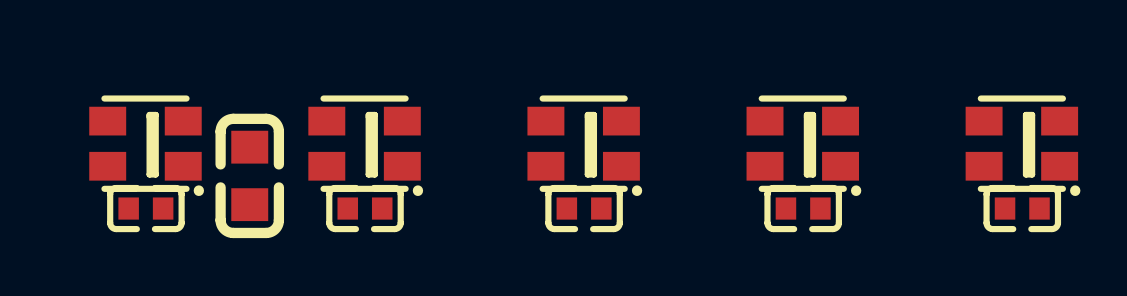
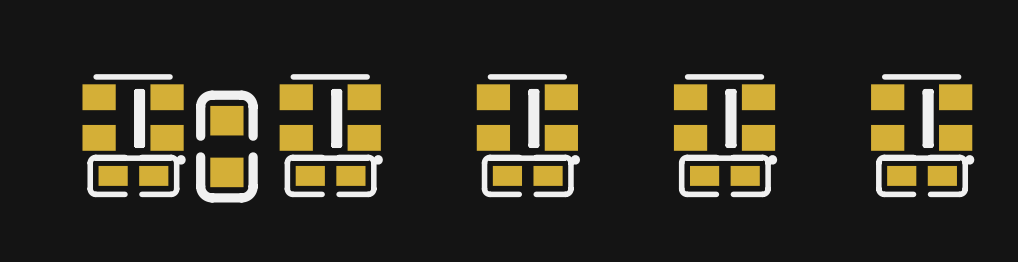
part footprint: [107, 184, 185, 233] -> [87, 154, 180, 198]
part footprint: [326, 184, 404, 233] -> [284, 154, 377, 198]
part footprint: [545, 184, 623, 233] -> [481, 154, 574, 198]
part footprint: [764, 184, 842, 233] -> [678, 154, 771, 198]
part footprint: [983, 184, 1062, 233] -> [876, 154, 969, 198]

